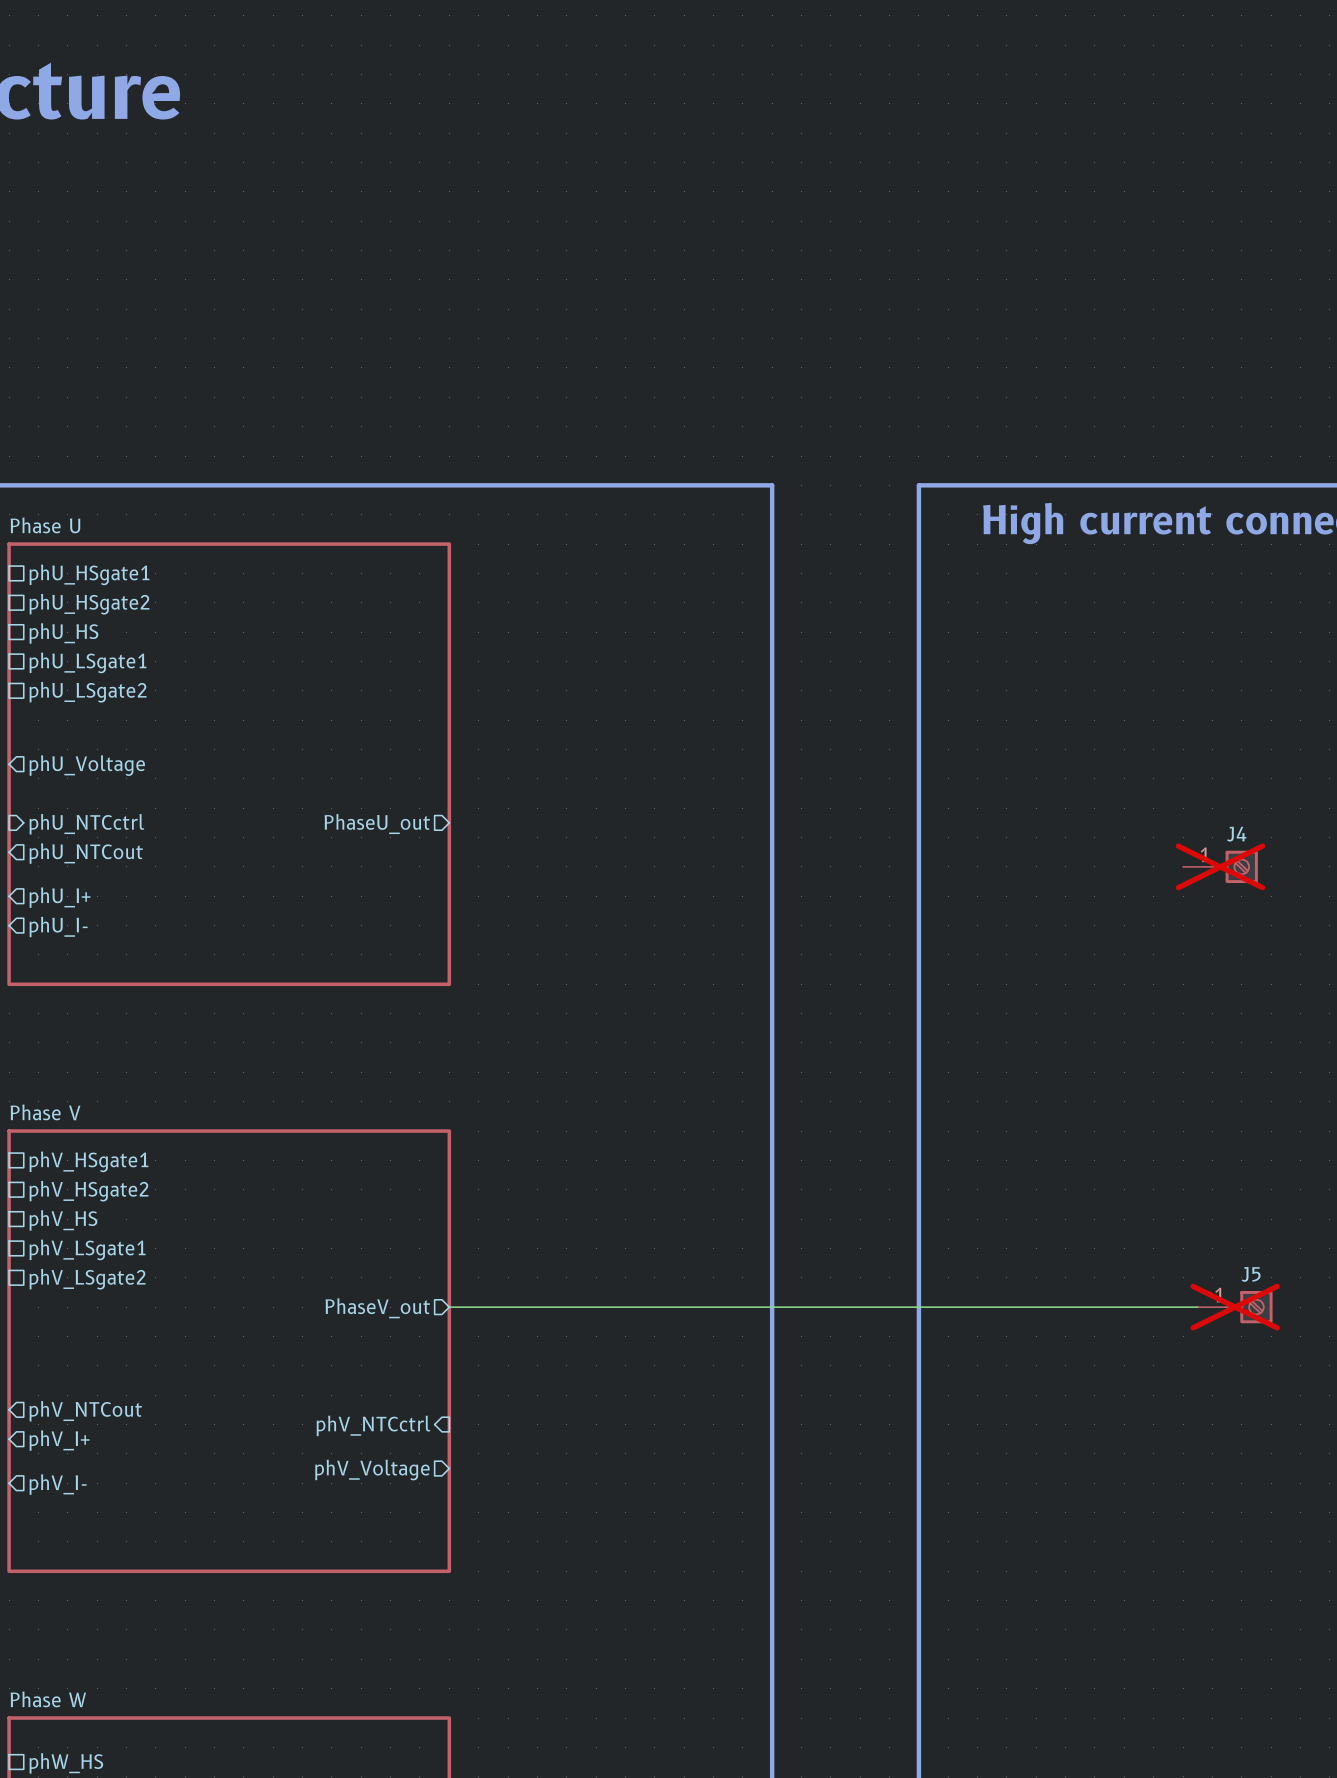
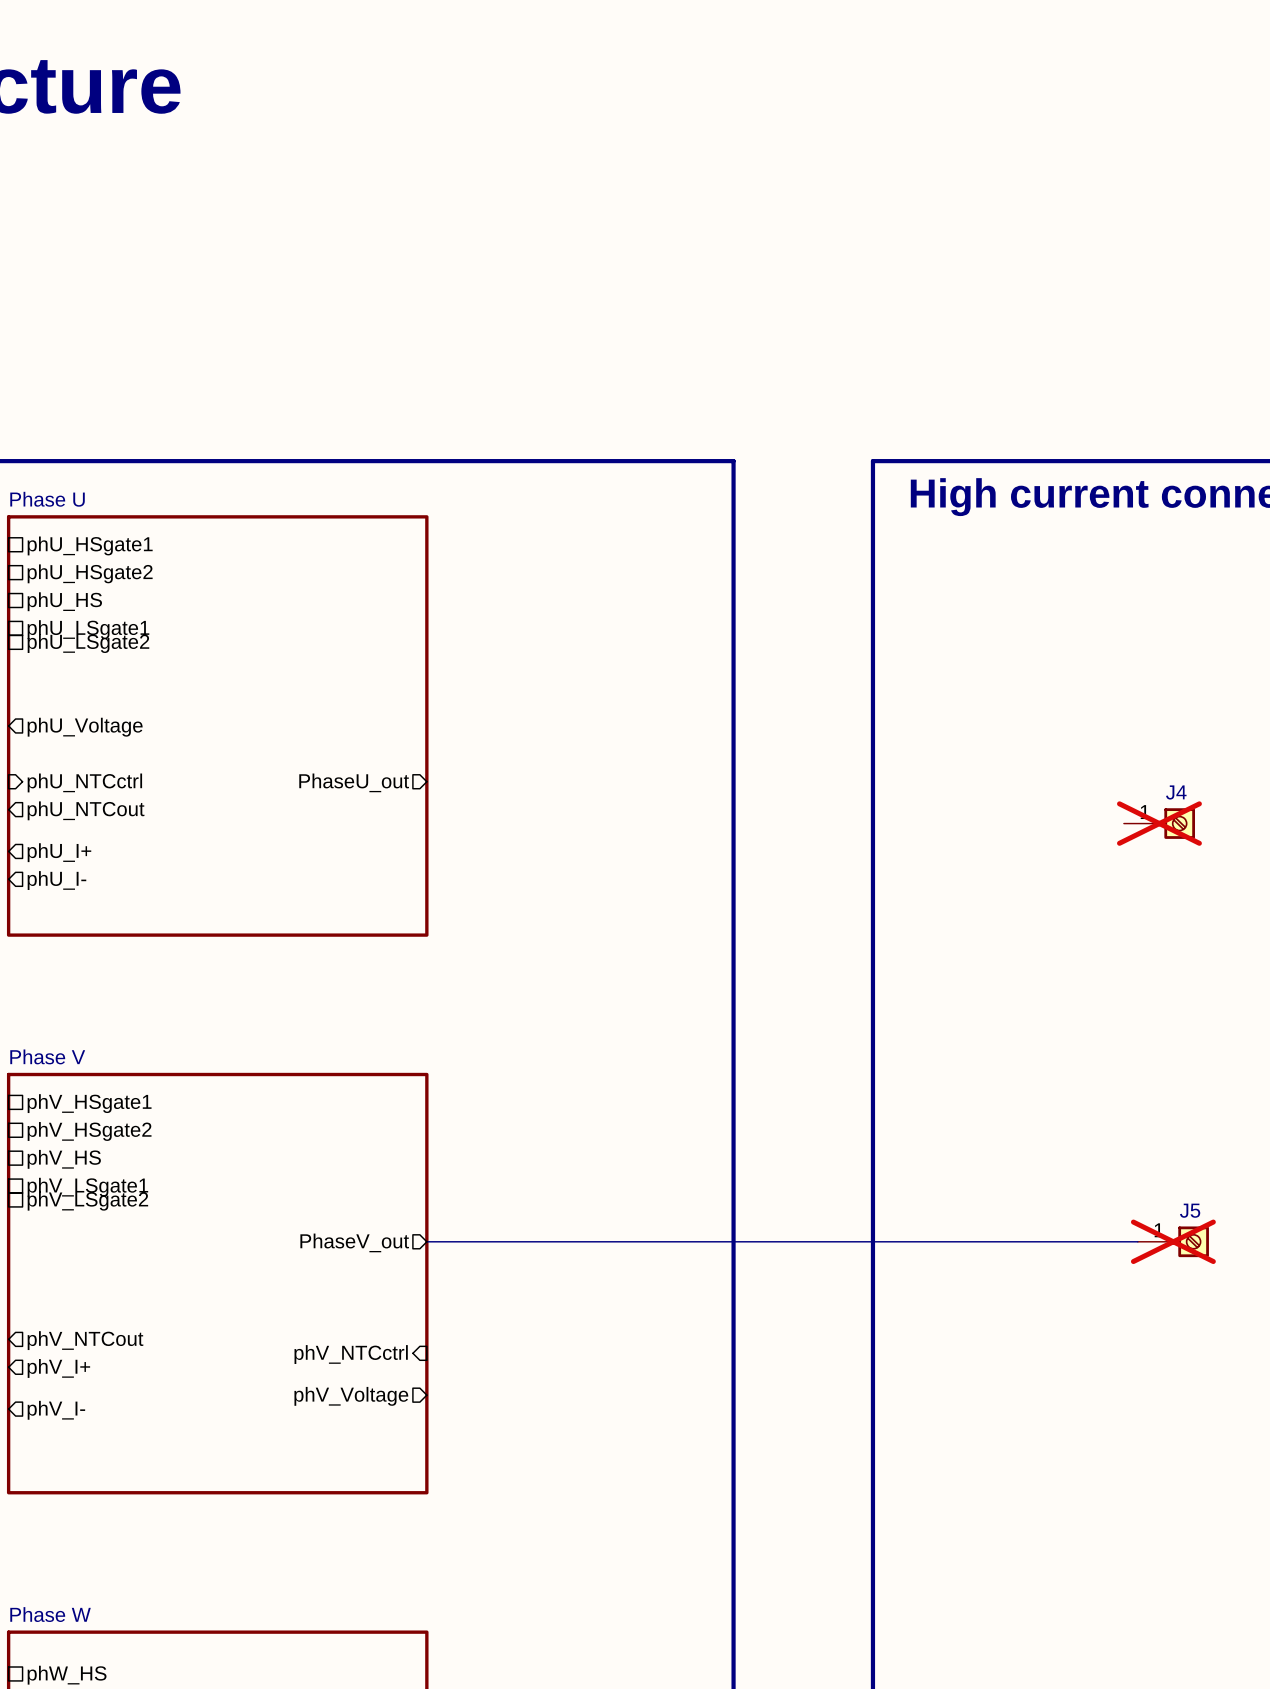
sheet pin position: phU_LSgate2 (88, 692) -> phU_LSgate2 (88, 643)
sheet pin position: phV_LSgate2 (87, 1279) -> phV_LSgate2 (87, 1201)

